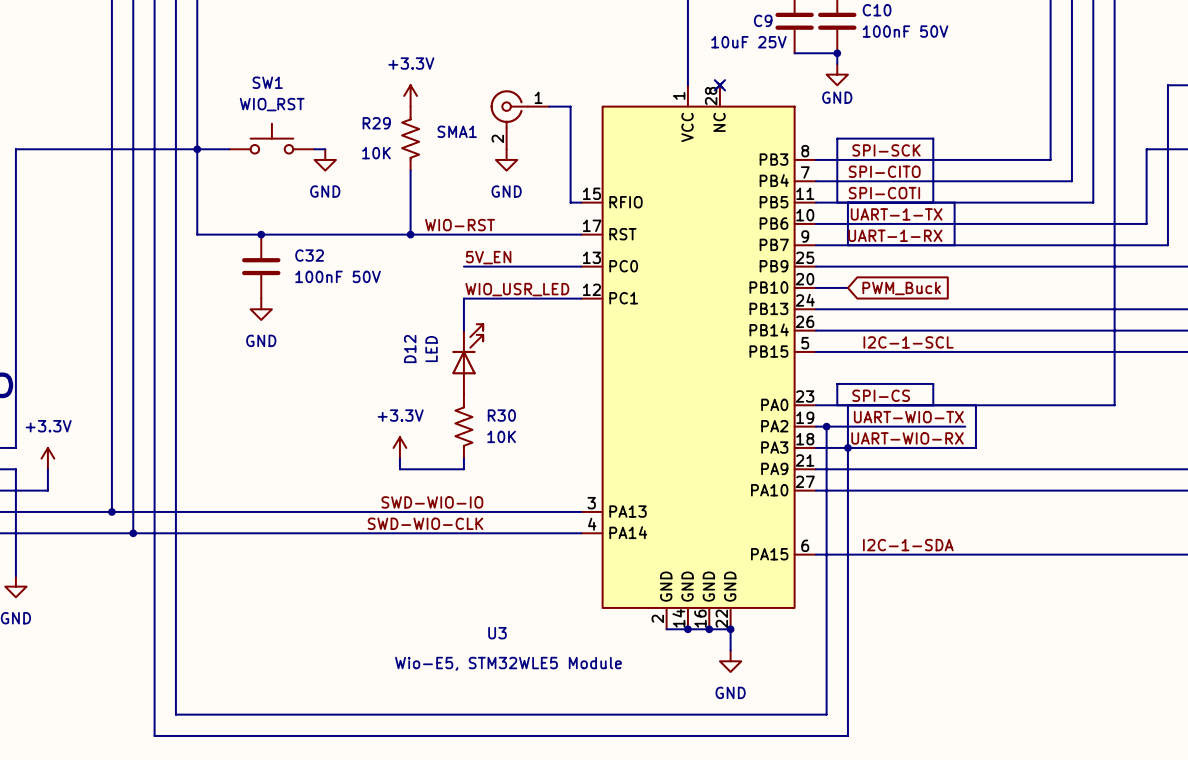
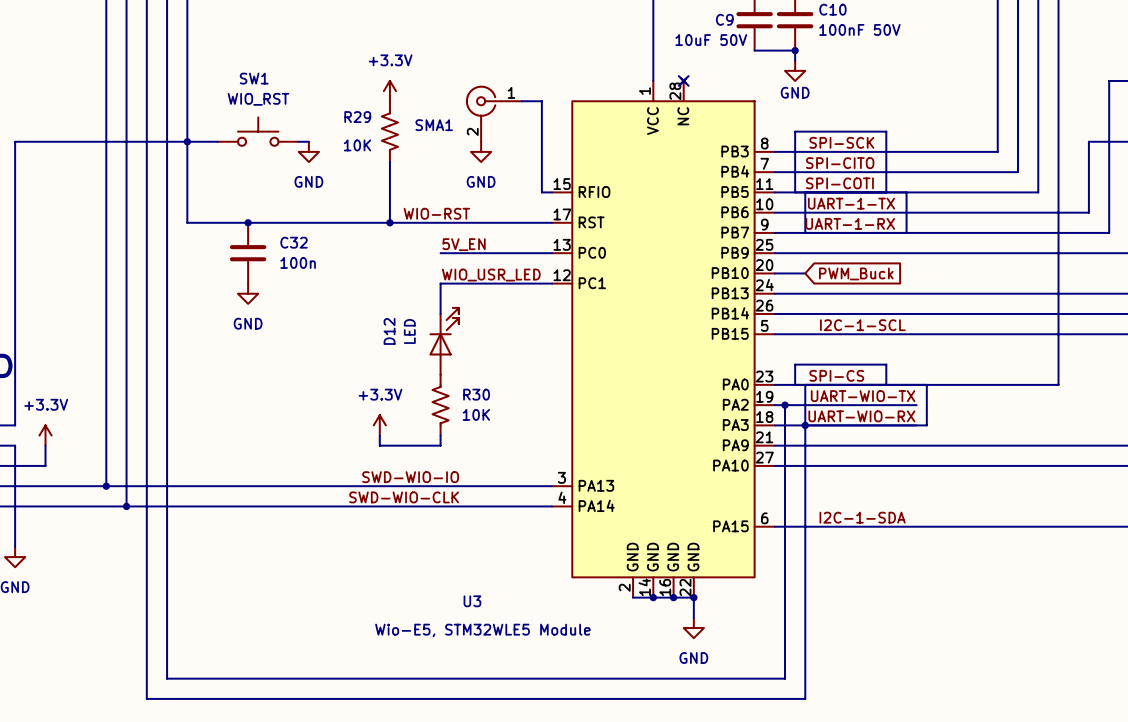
C9 value: 10uF 25V (748, 42) -> 10uF 50V (711, 40)
C32 value: 100nF 50V (338, 276) -> 100n (298, 262)

